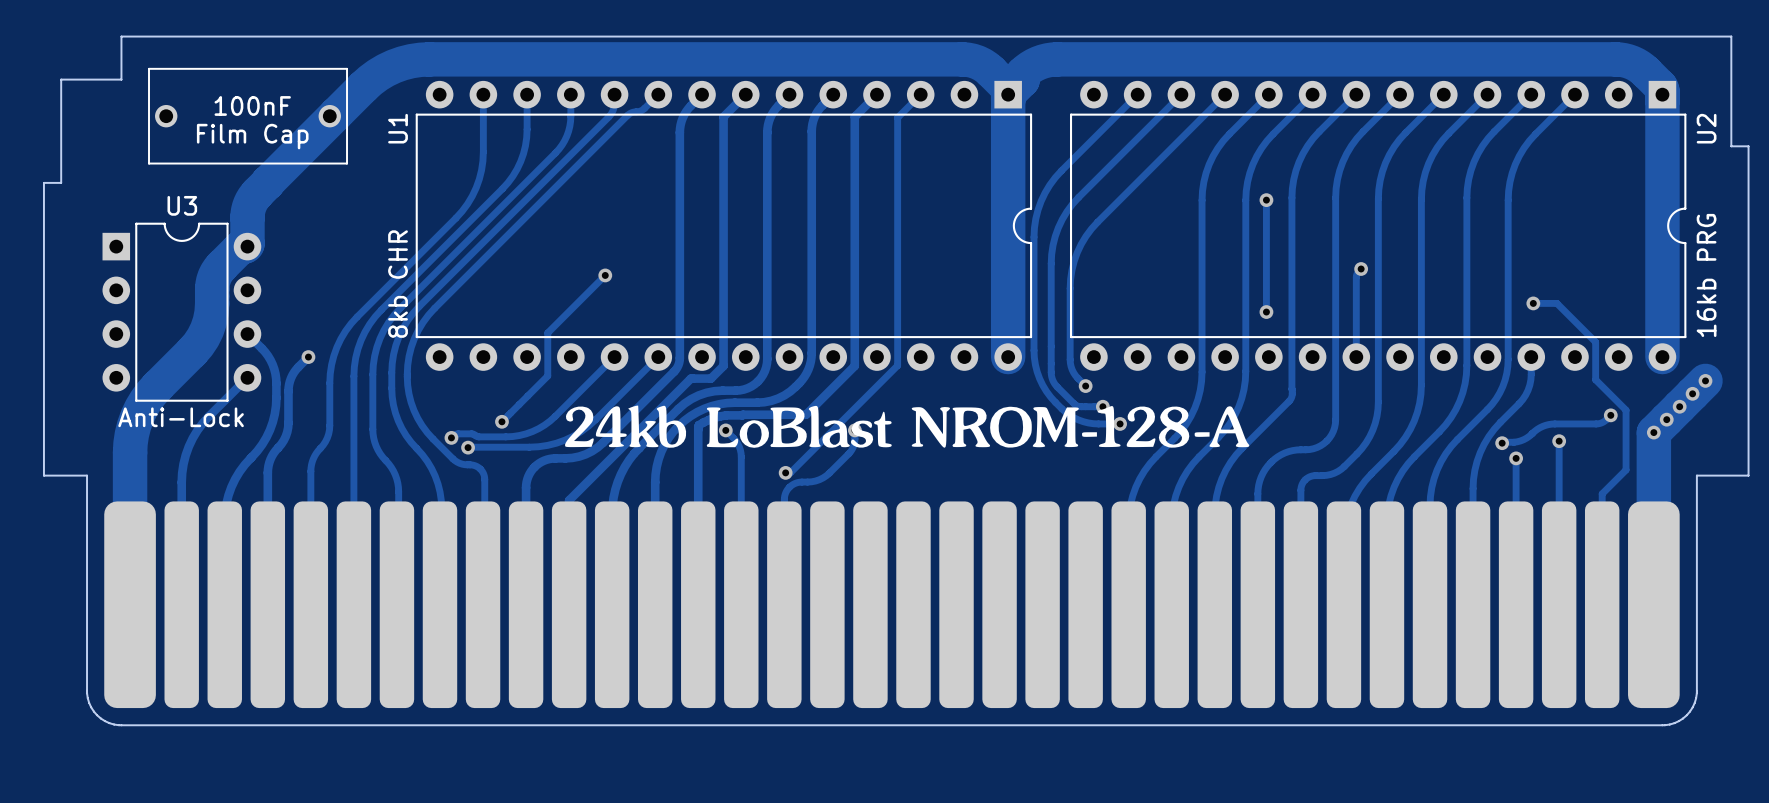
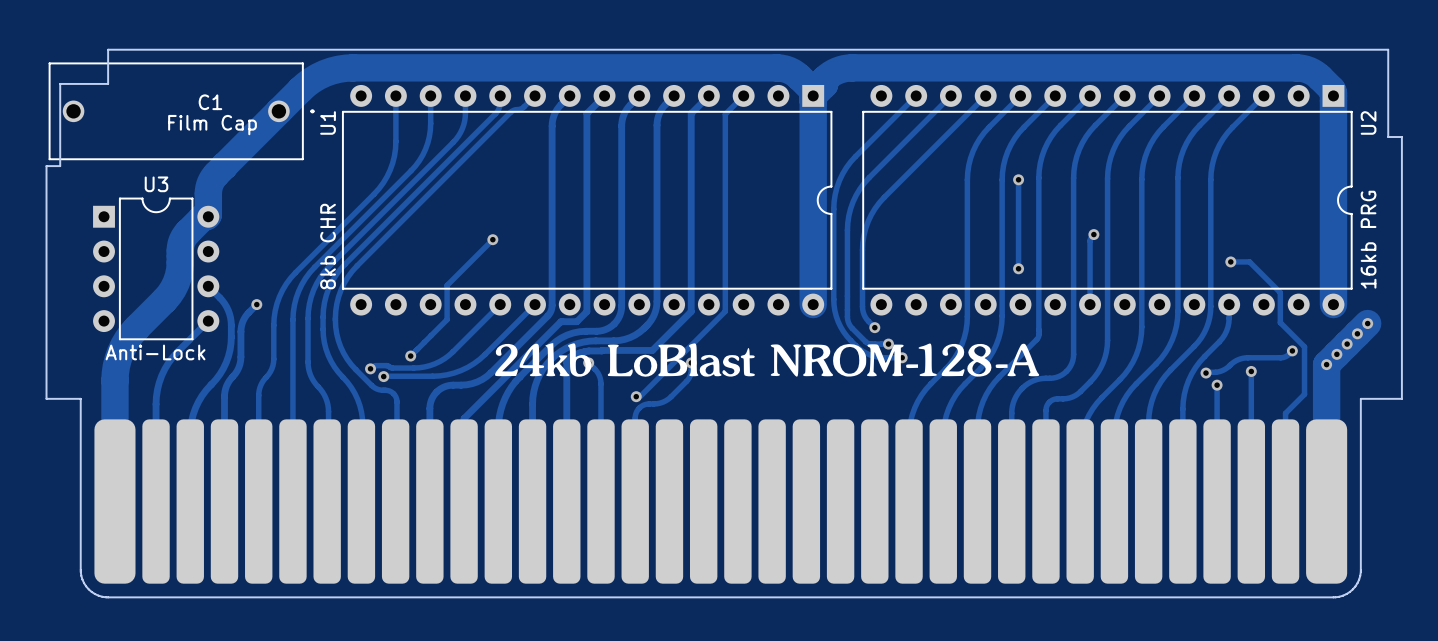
text: 100nF (252, 105) -> none
C1: none -> Film Cap (181, 111)
part: (248, 116) -> none
text: Film Cap (252, 136) -> none
drawing position: (907, 426) -> (767, 359)

